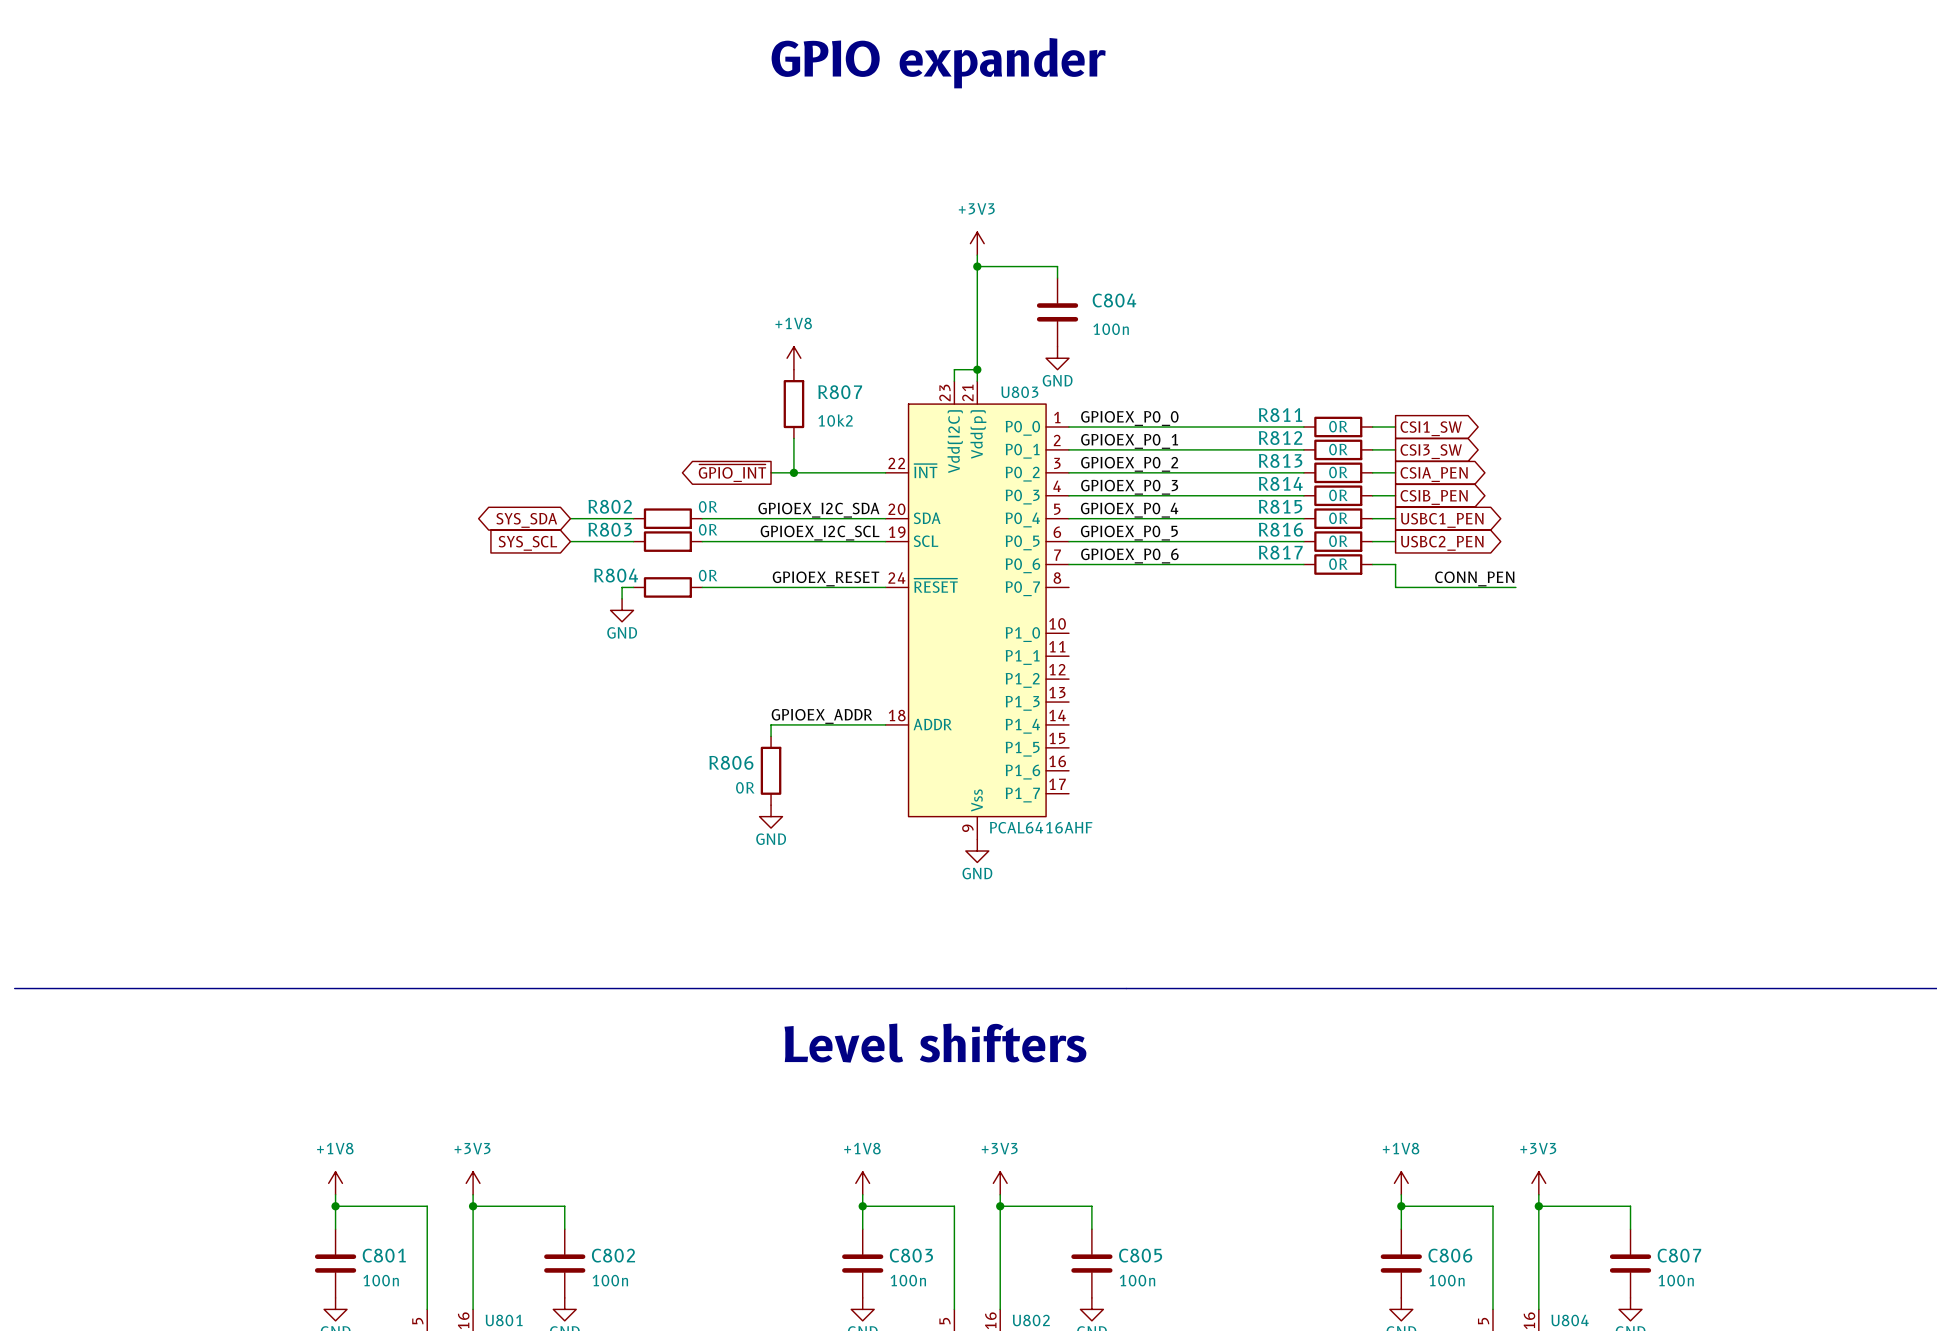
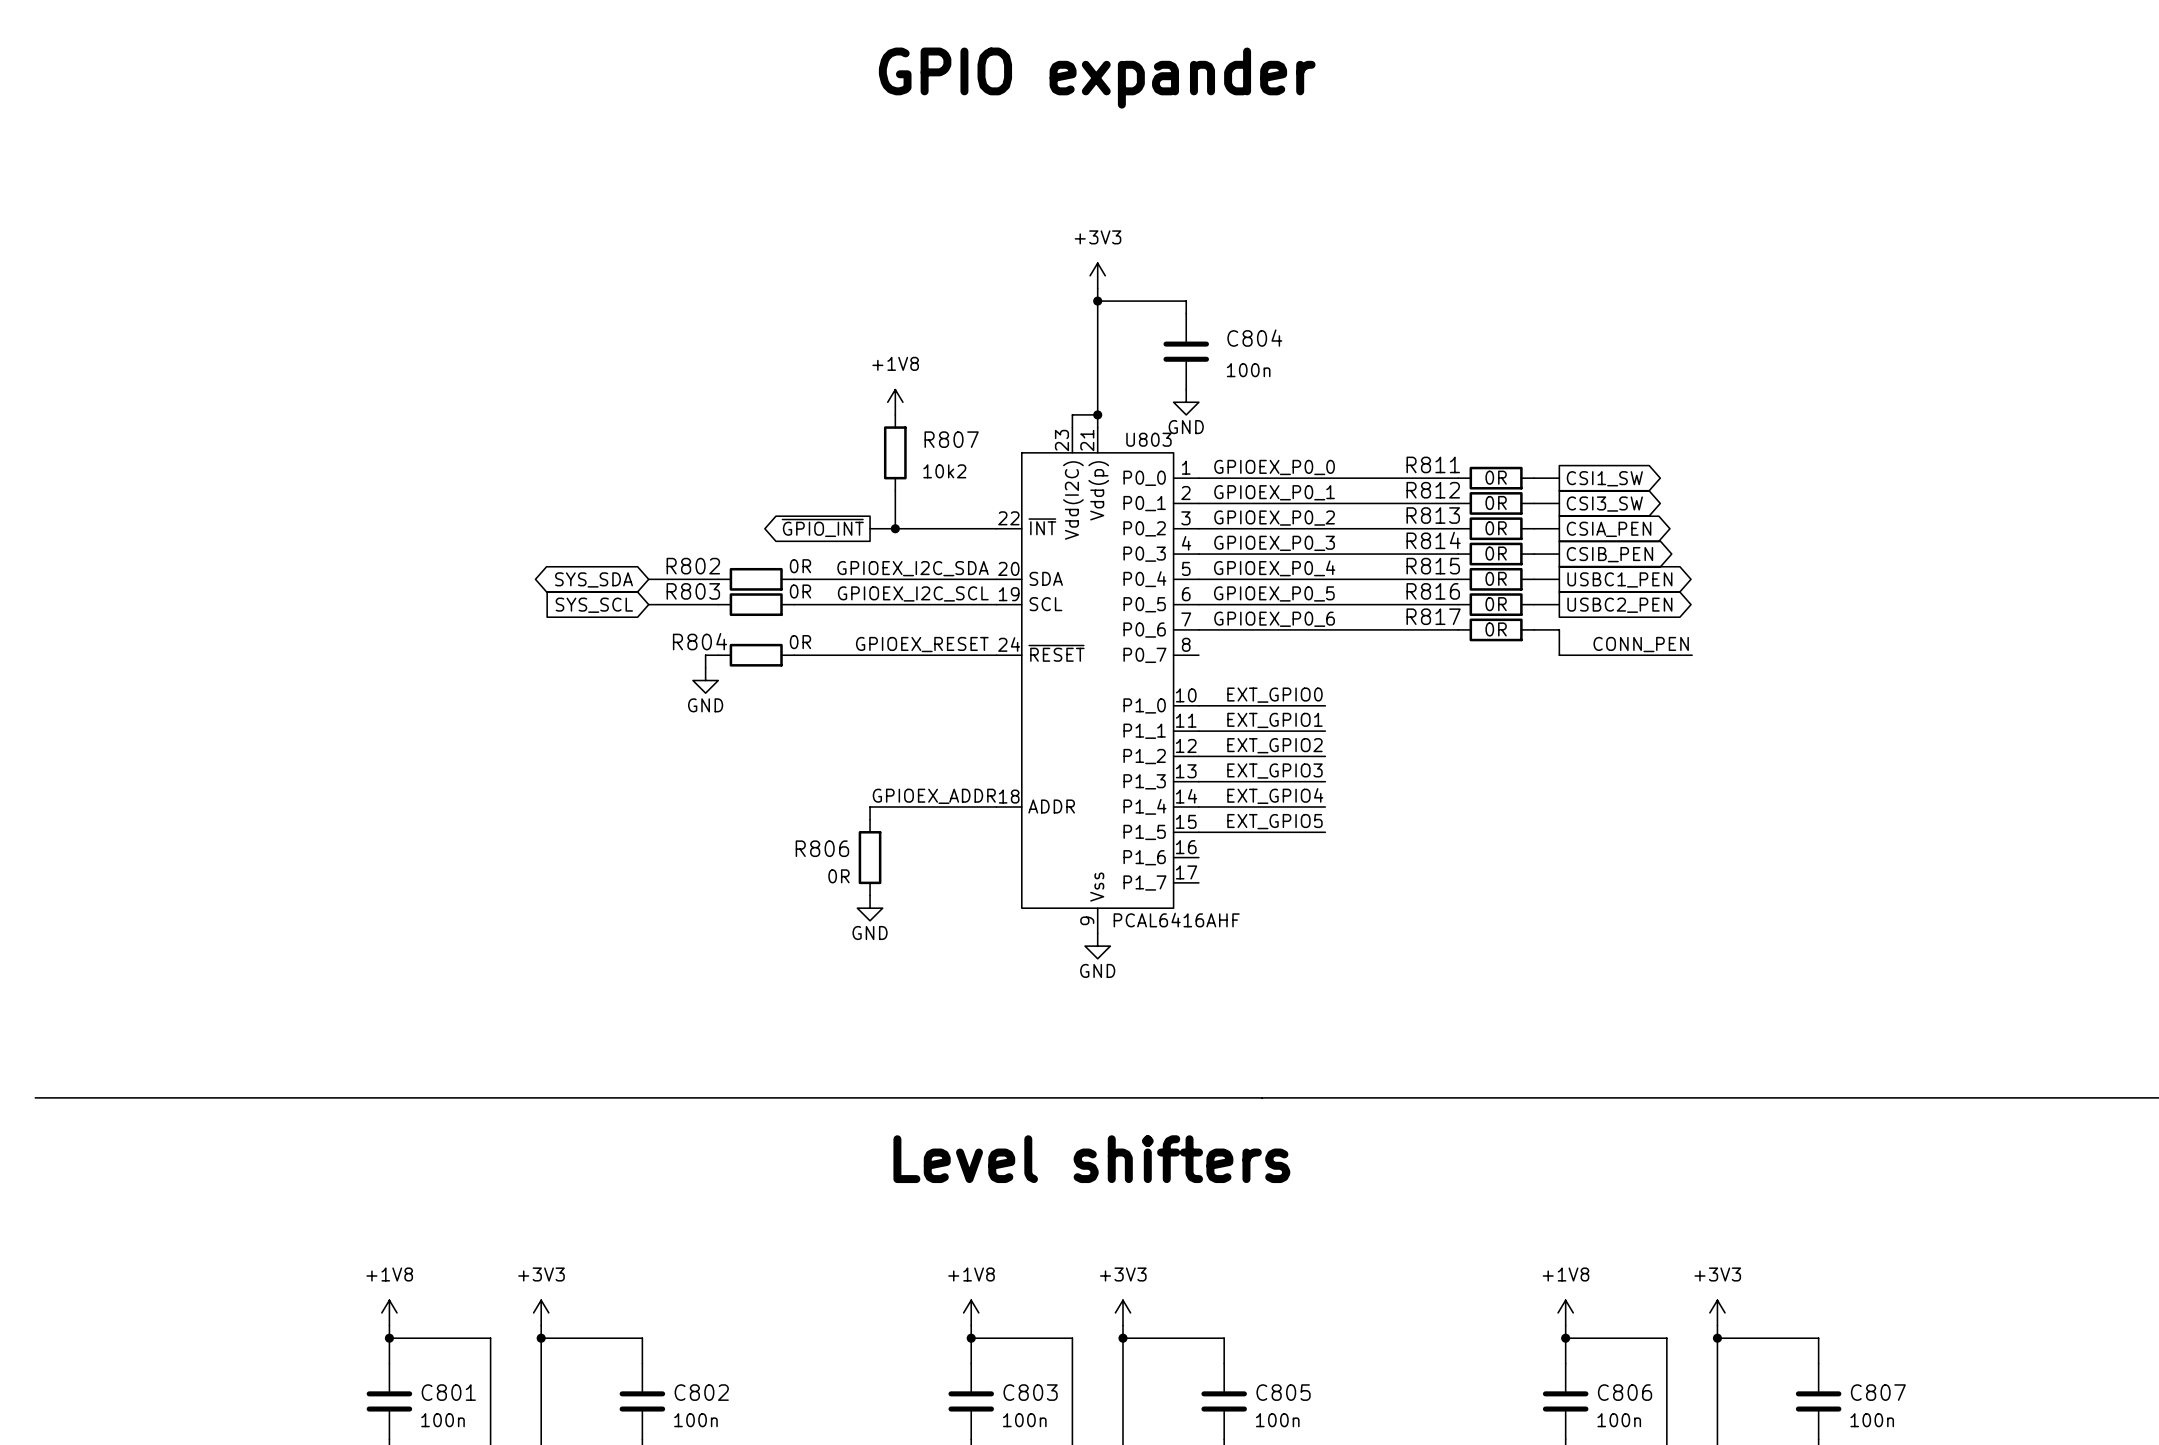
label: none -> EXT_GPIO0 (1274, 695)
wire: none -> (1198, 705) (1325, 705)
label: none -> EXT_GPIO1 (1274, 720)
wire: none -> (1198, 731) (1325, 731)
label: none -> EXT_GPIO2 (1274, 745)
wire: none -> (1198, 756) (1325, 756)
label: none -> EXT_GPIO3 (1274, 771)
wire: none -> (1198, 781) (1325, 781)
label: none -> EXT_GPIO4 (1275, 796)
wire: none -> (1198, 807) (1325, 807)
label: none -> EXT_GPIO5 (1274, 821)
wire: none -> (1198, 832) (1325, 832)

